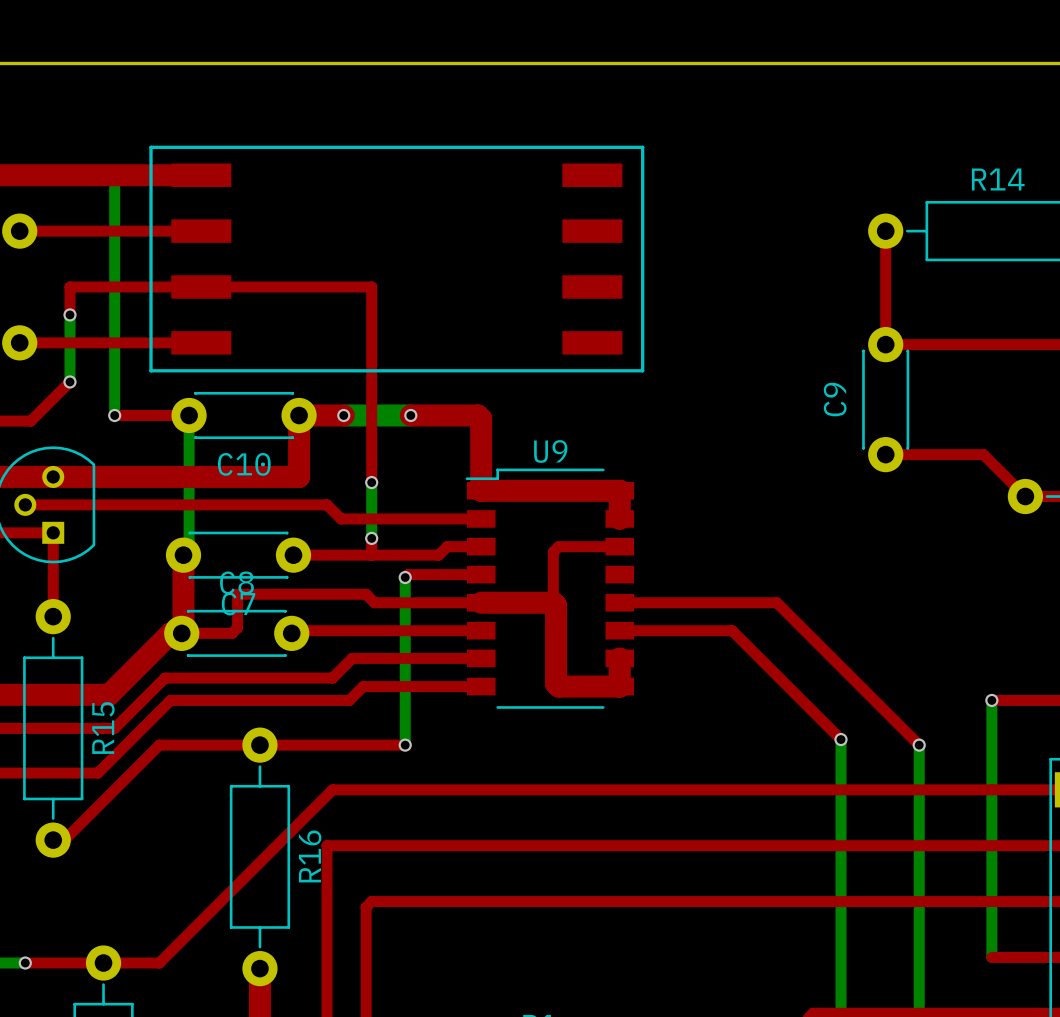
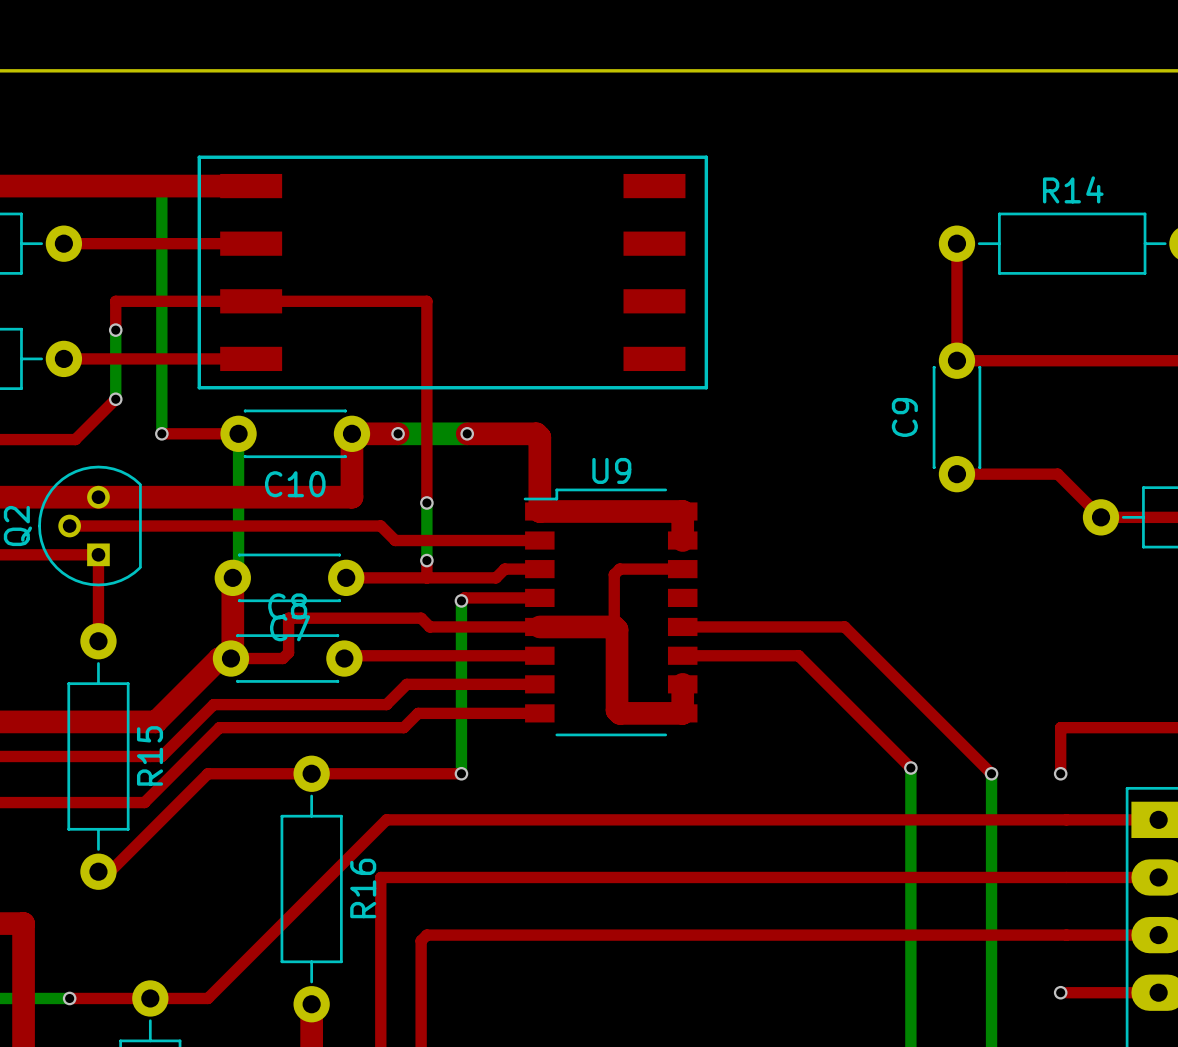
bottom track: (991, 700) (991, 957) -> none
top track: none -> (1066, 727) (1060, 727) (1060, 773)
via position: (991, 700) -> (1060, 773)
via: none -> (1060, 992)

